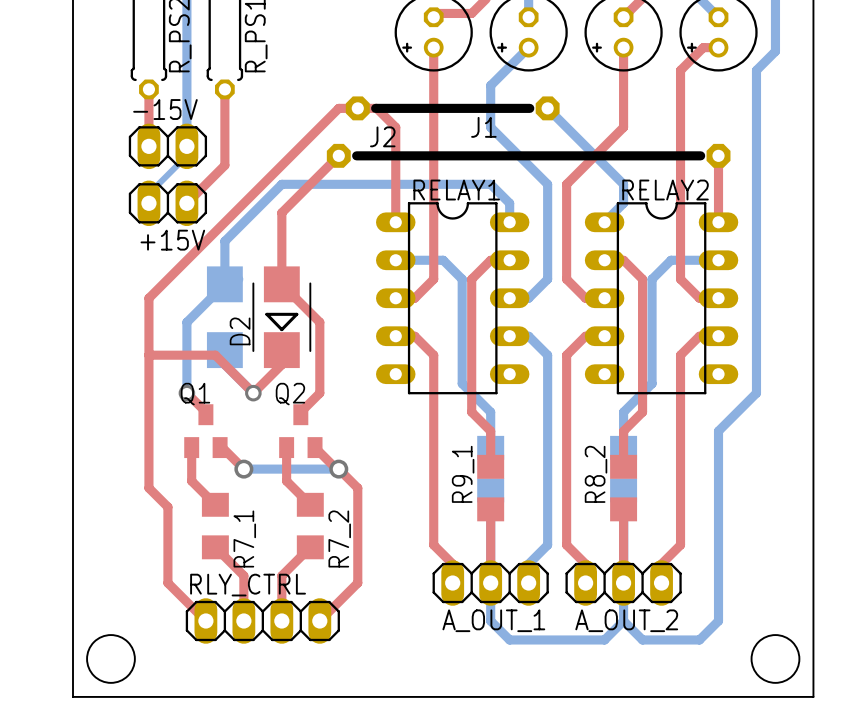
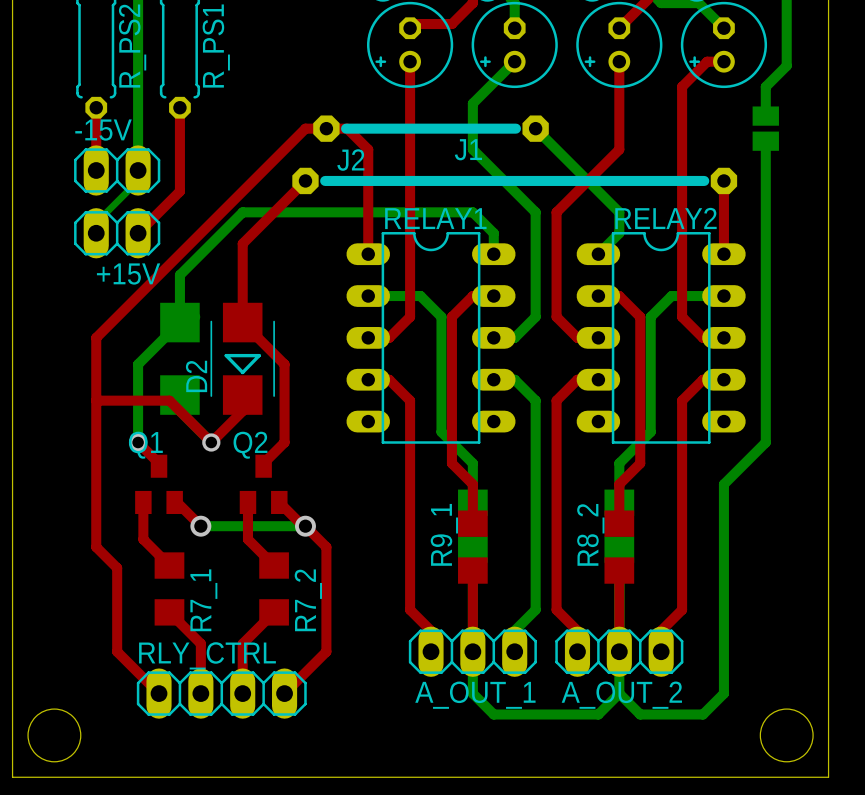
bottom track: (756, 96) (756, 119) -> none
part: none -> (765, 128)

